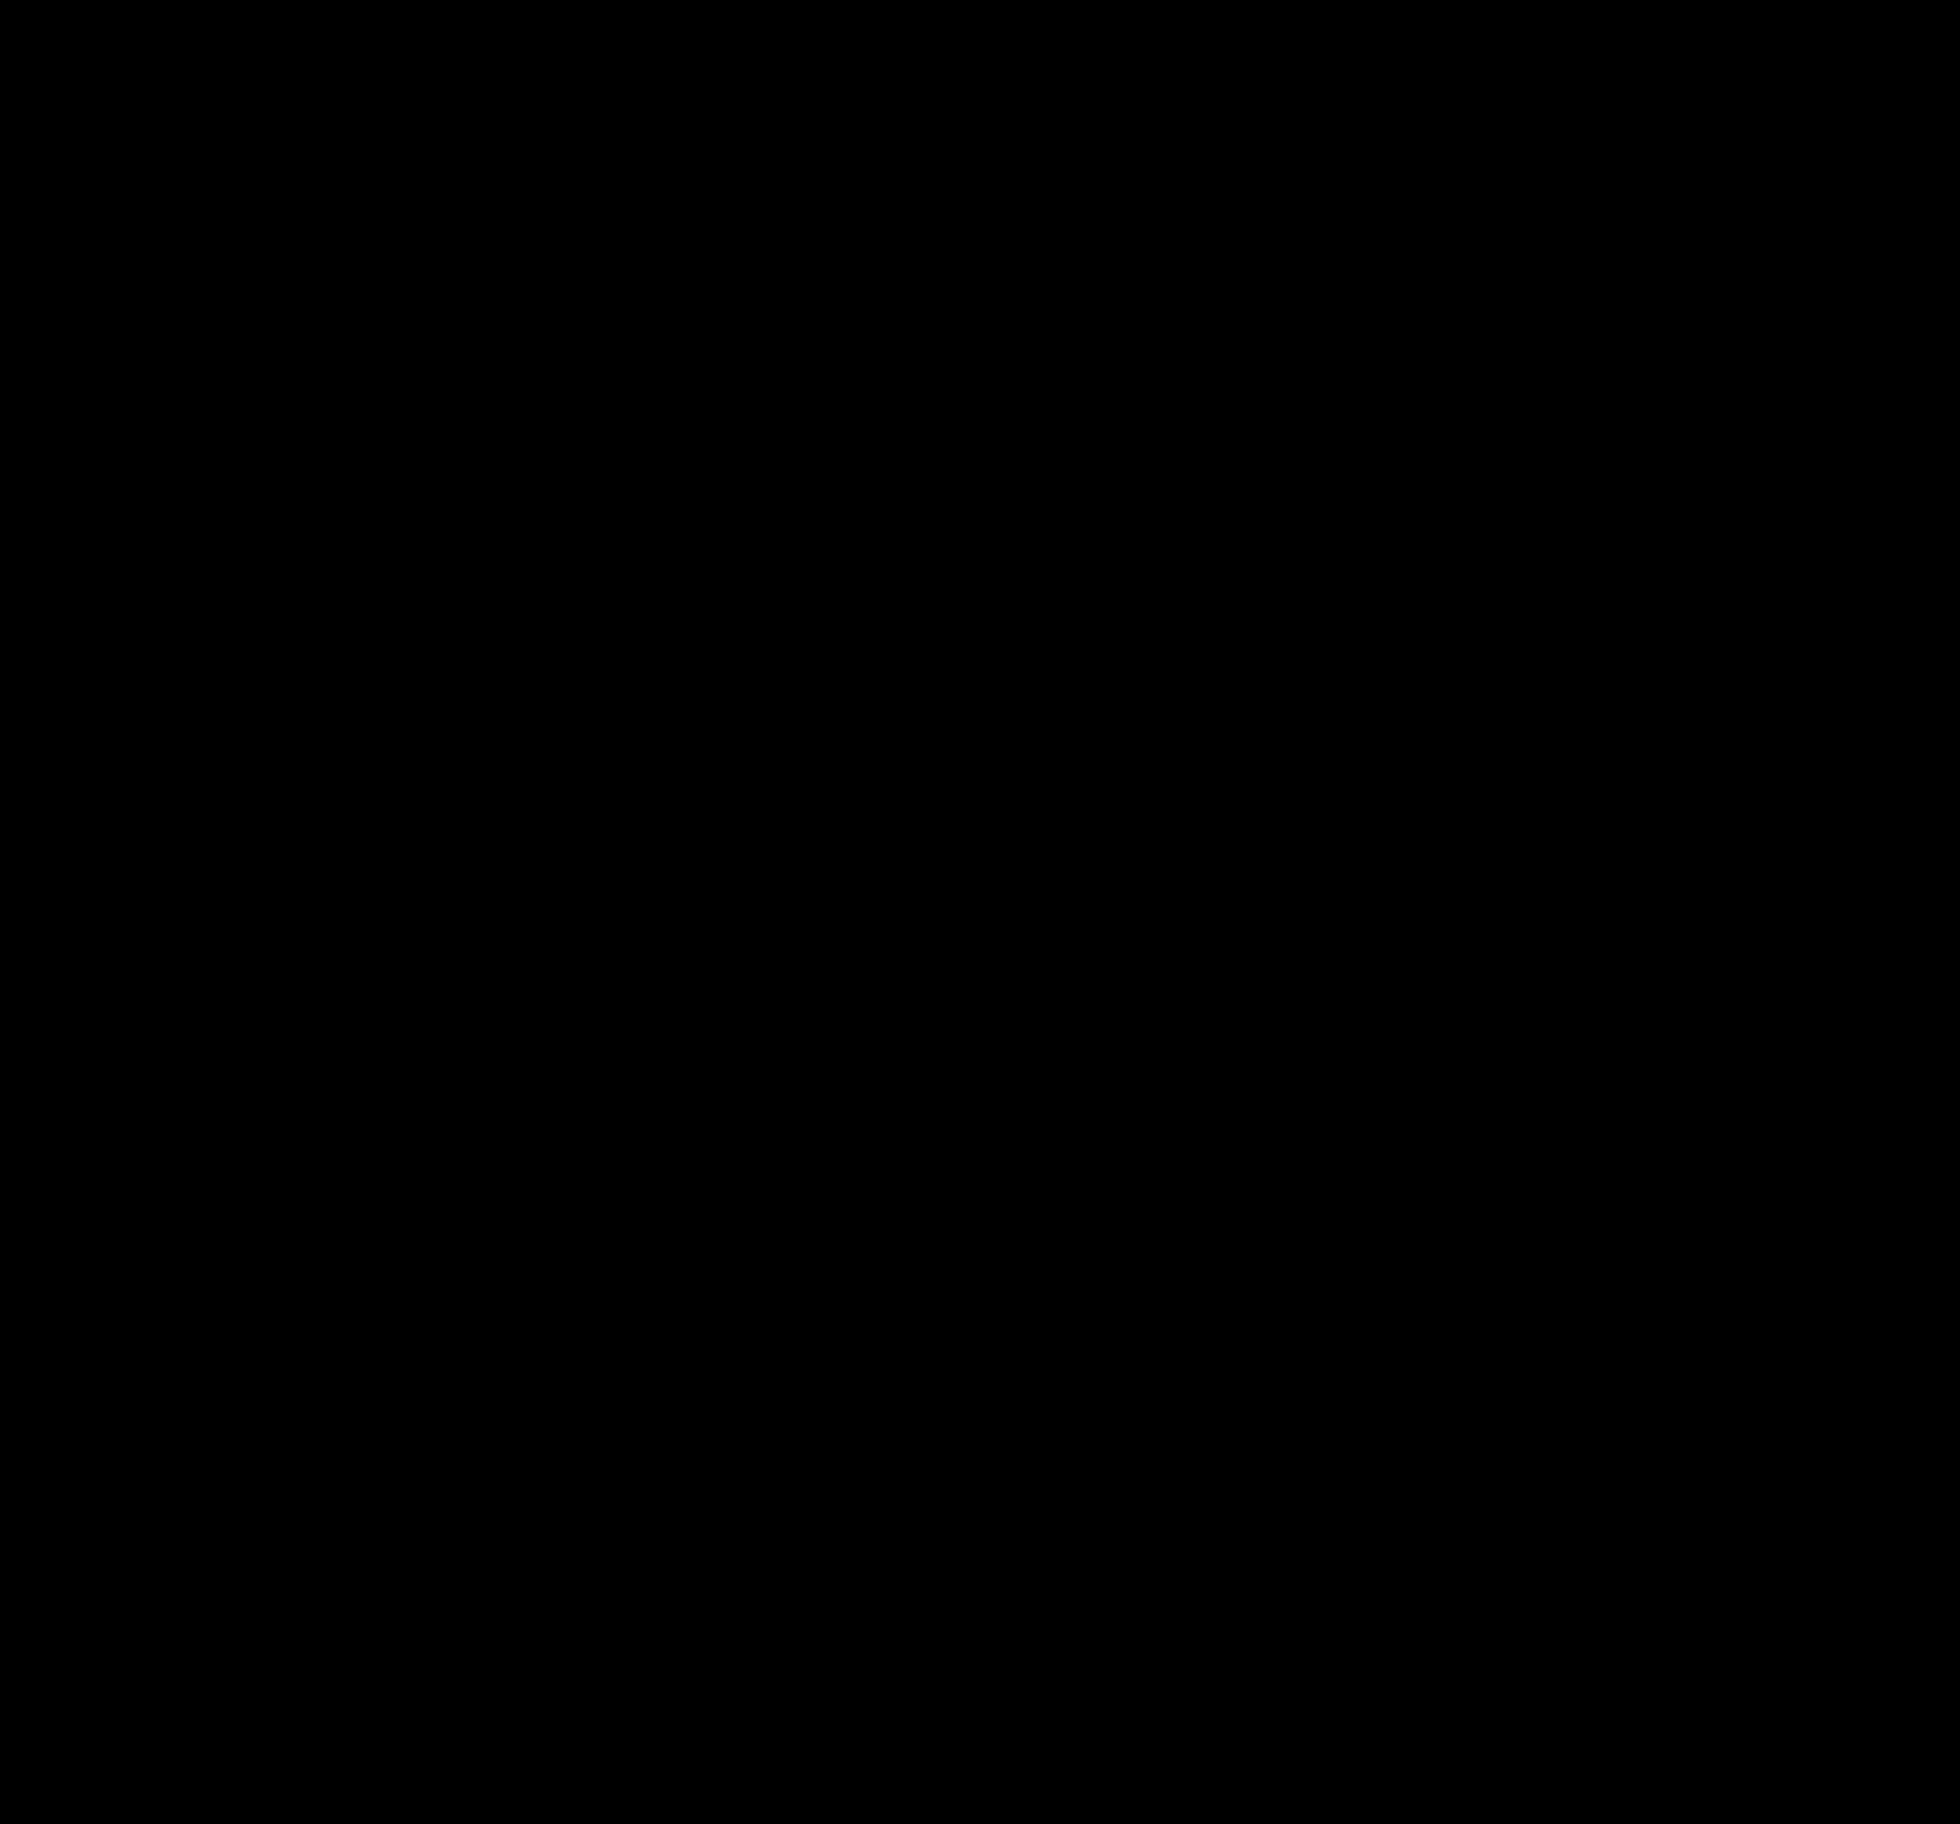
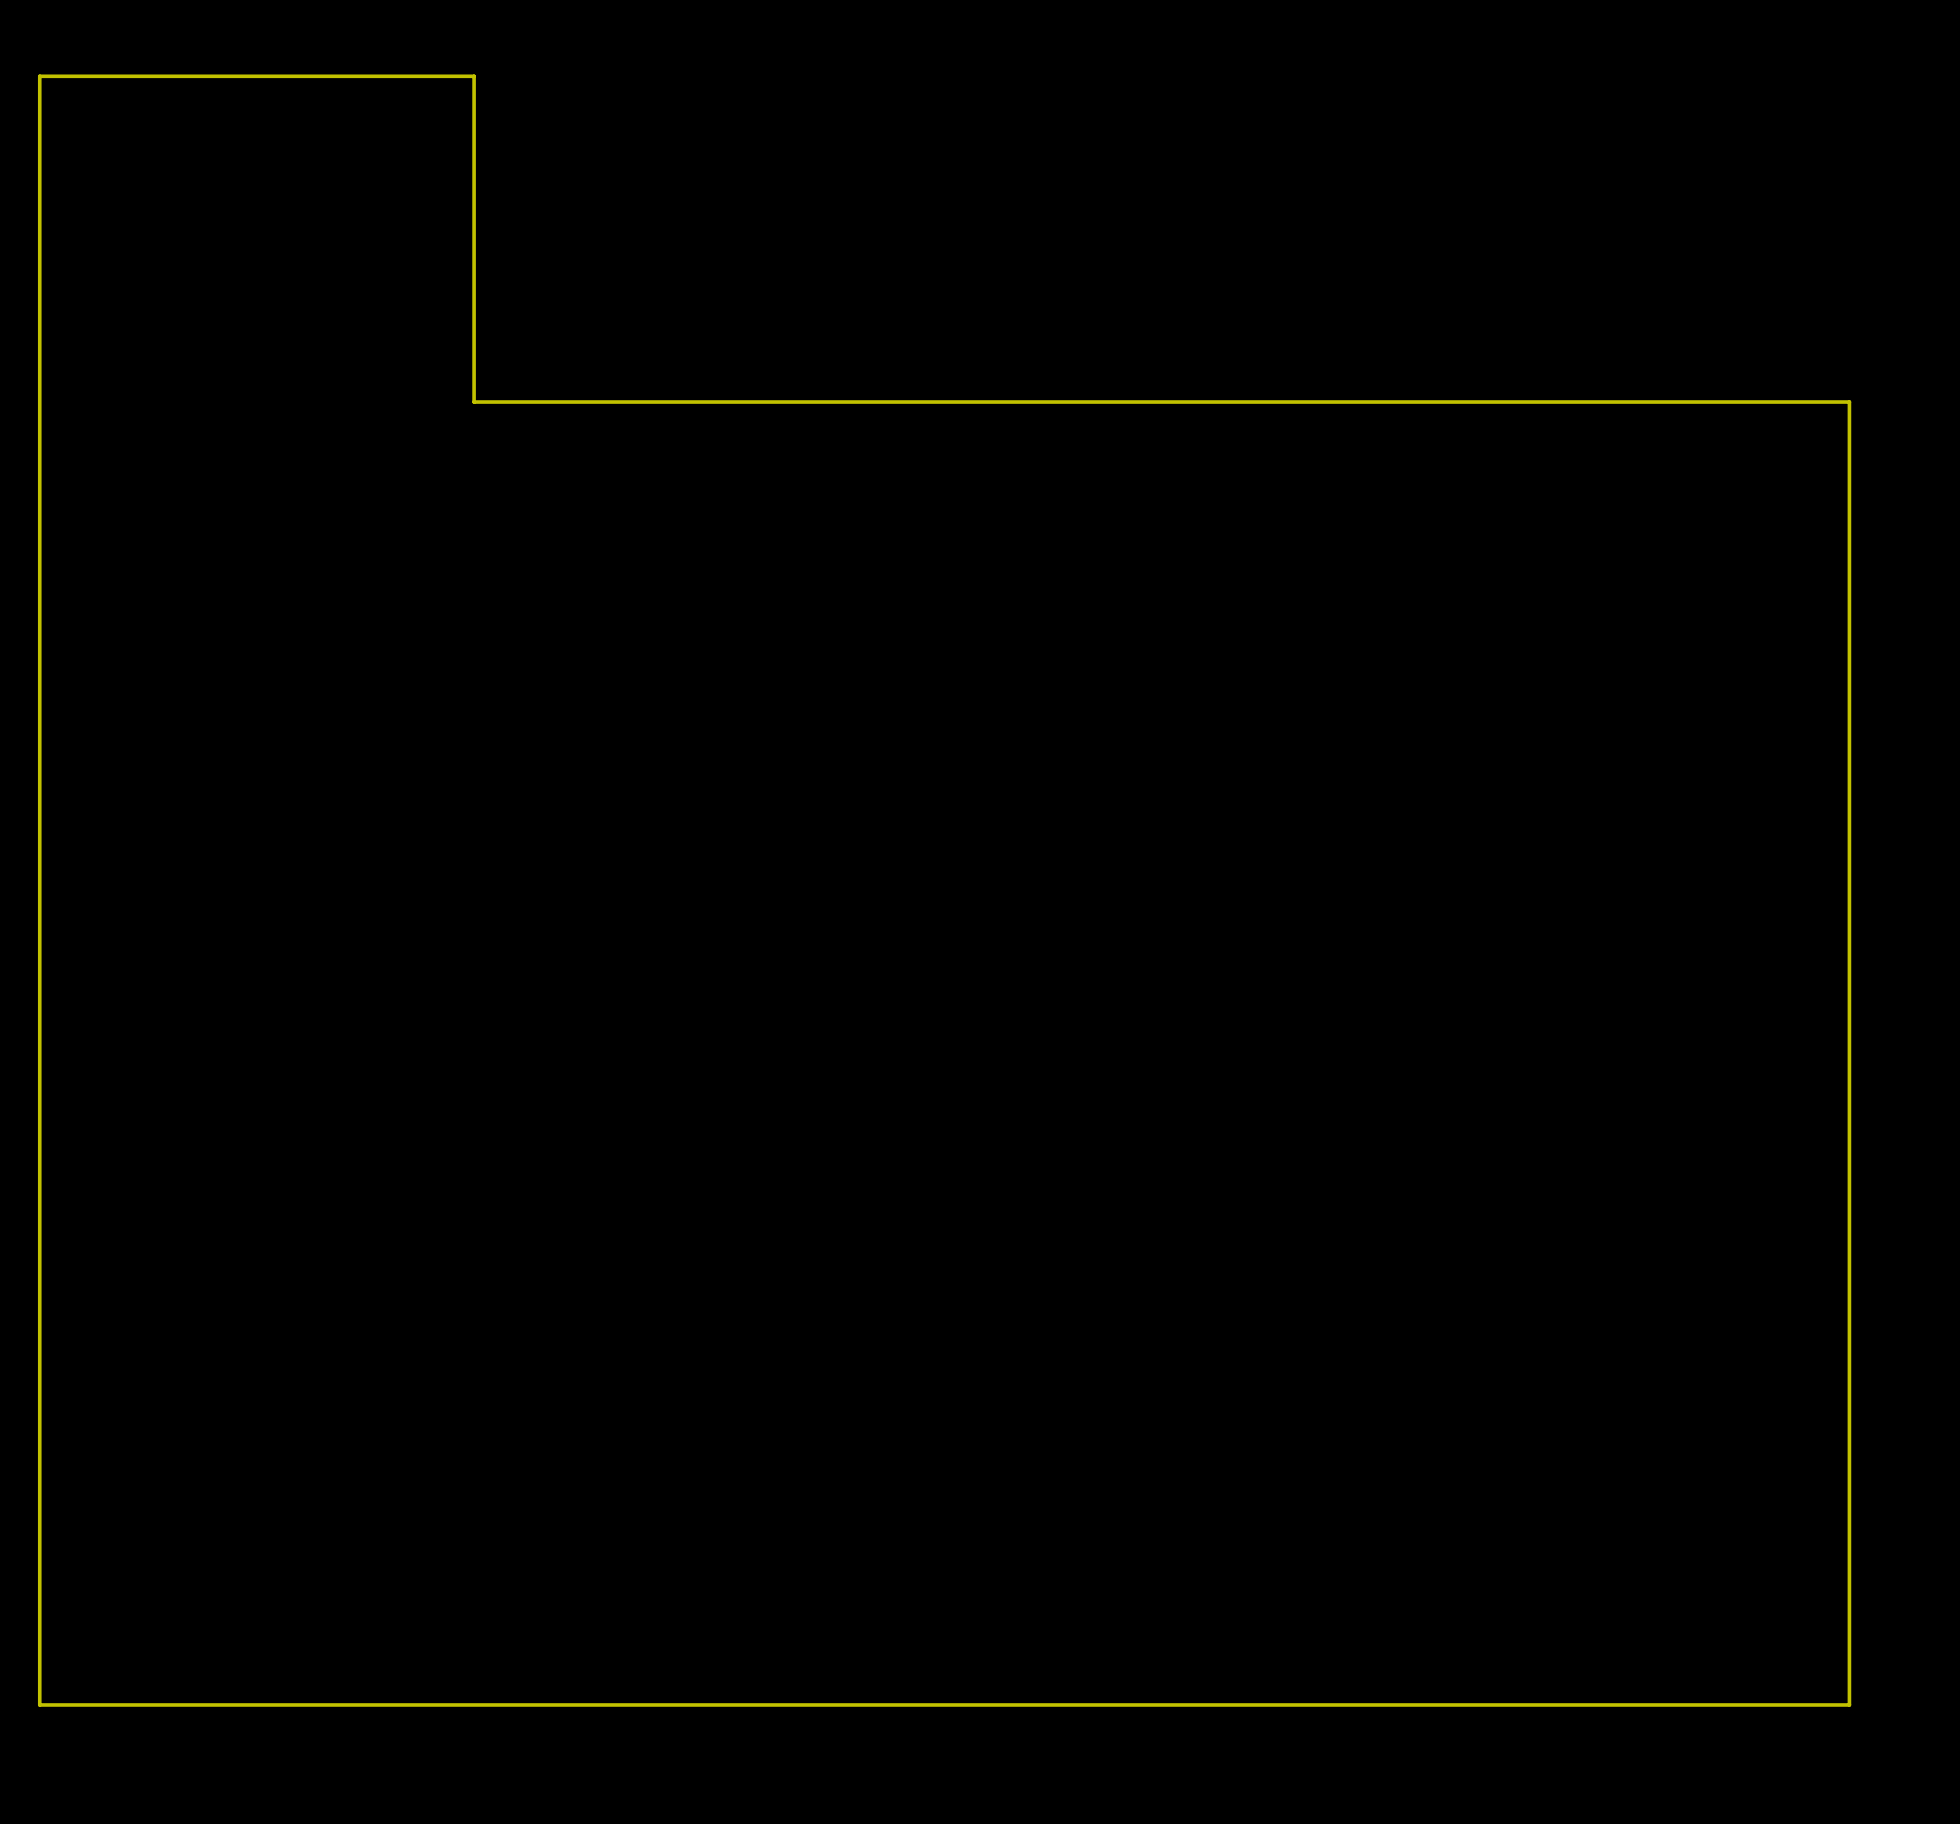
board edge: none -> (39, 76) (39, 1704) (1849, 1704) (1849, 402) (474, 402) (474, 76) (39, 76)

